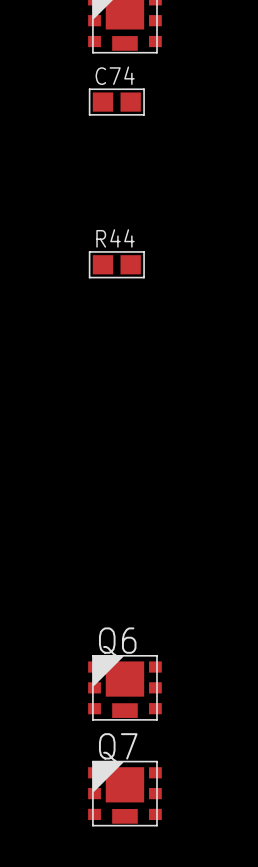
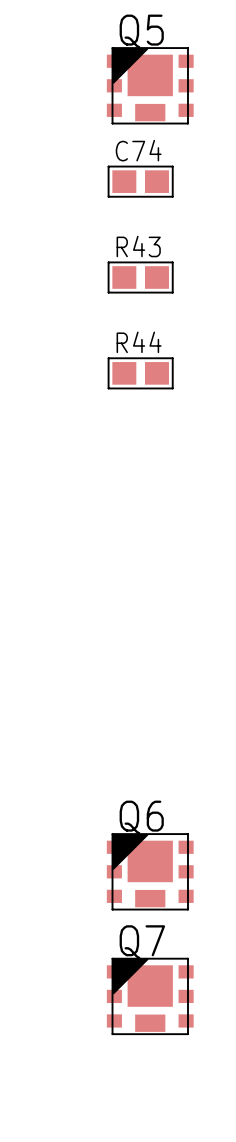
R43: none -> (140, 277)

